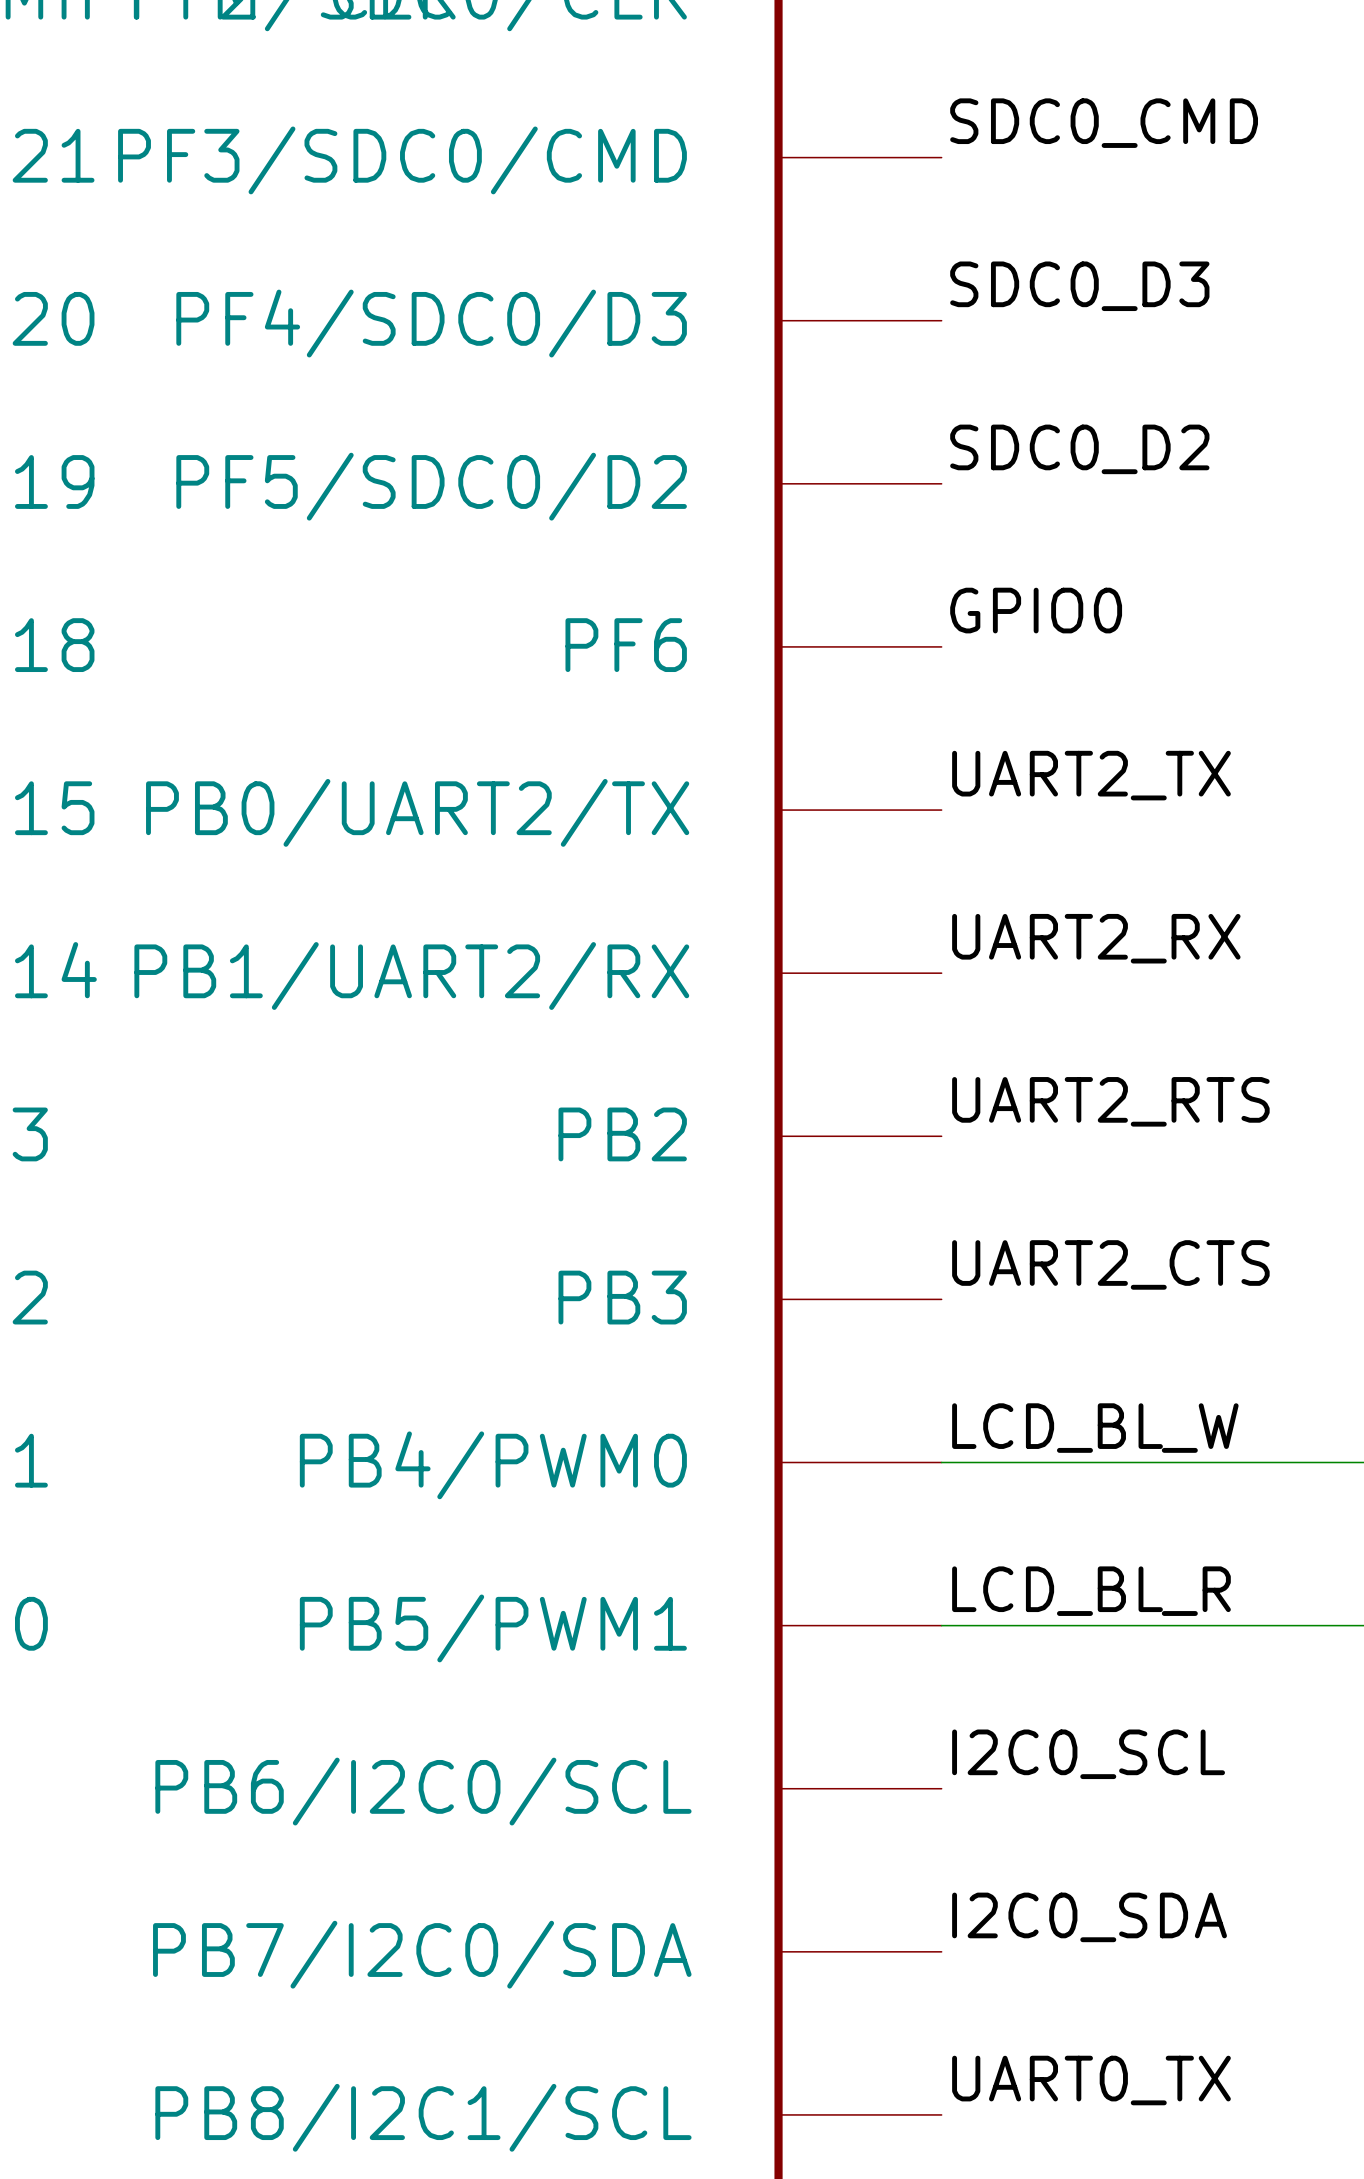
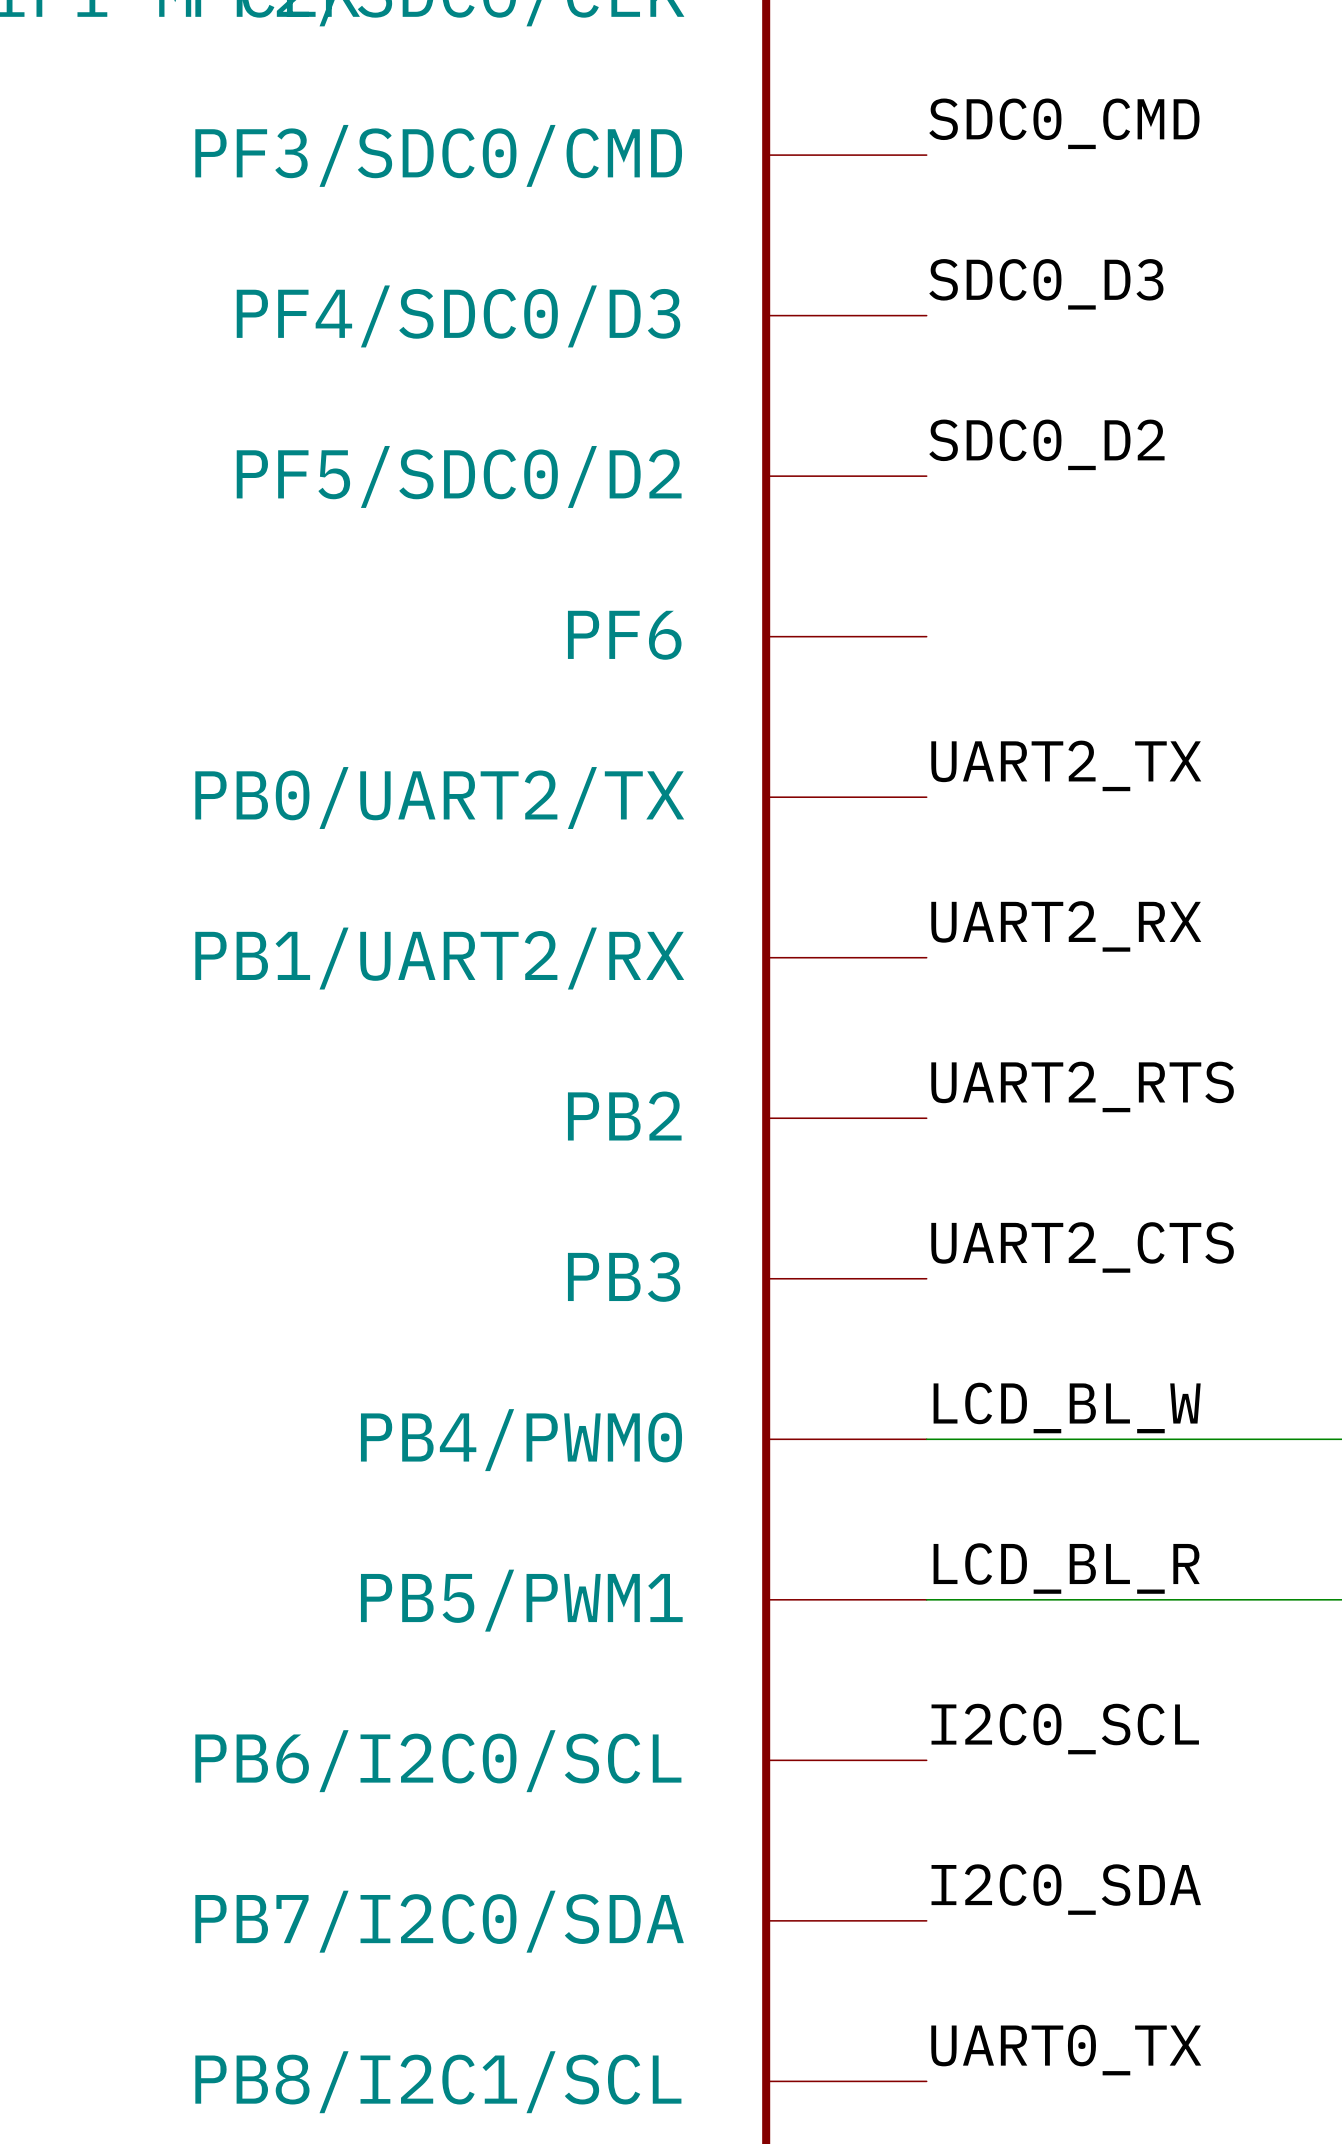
label: GPIO0 (1036, 610) -> none

